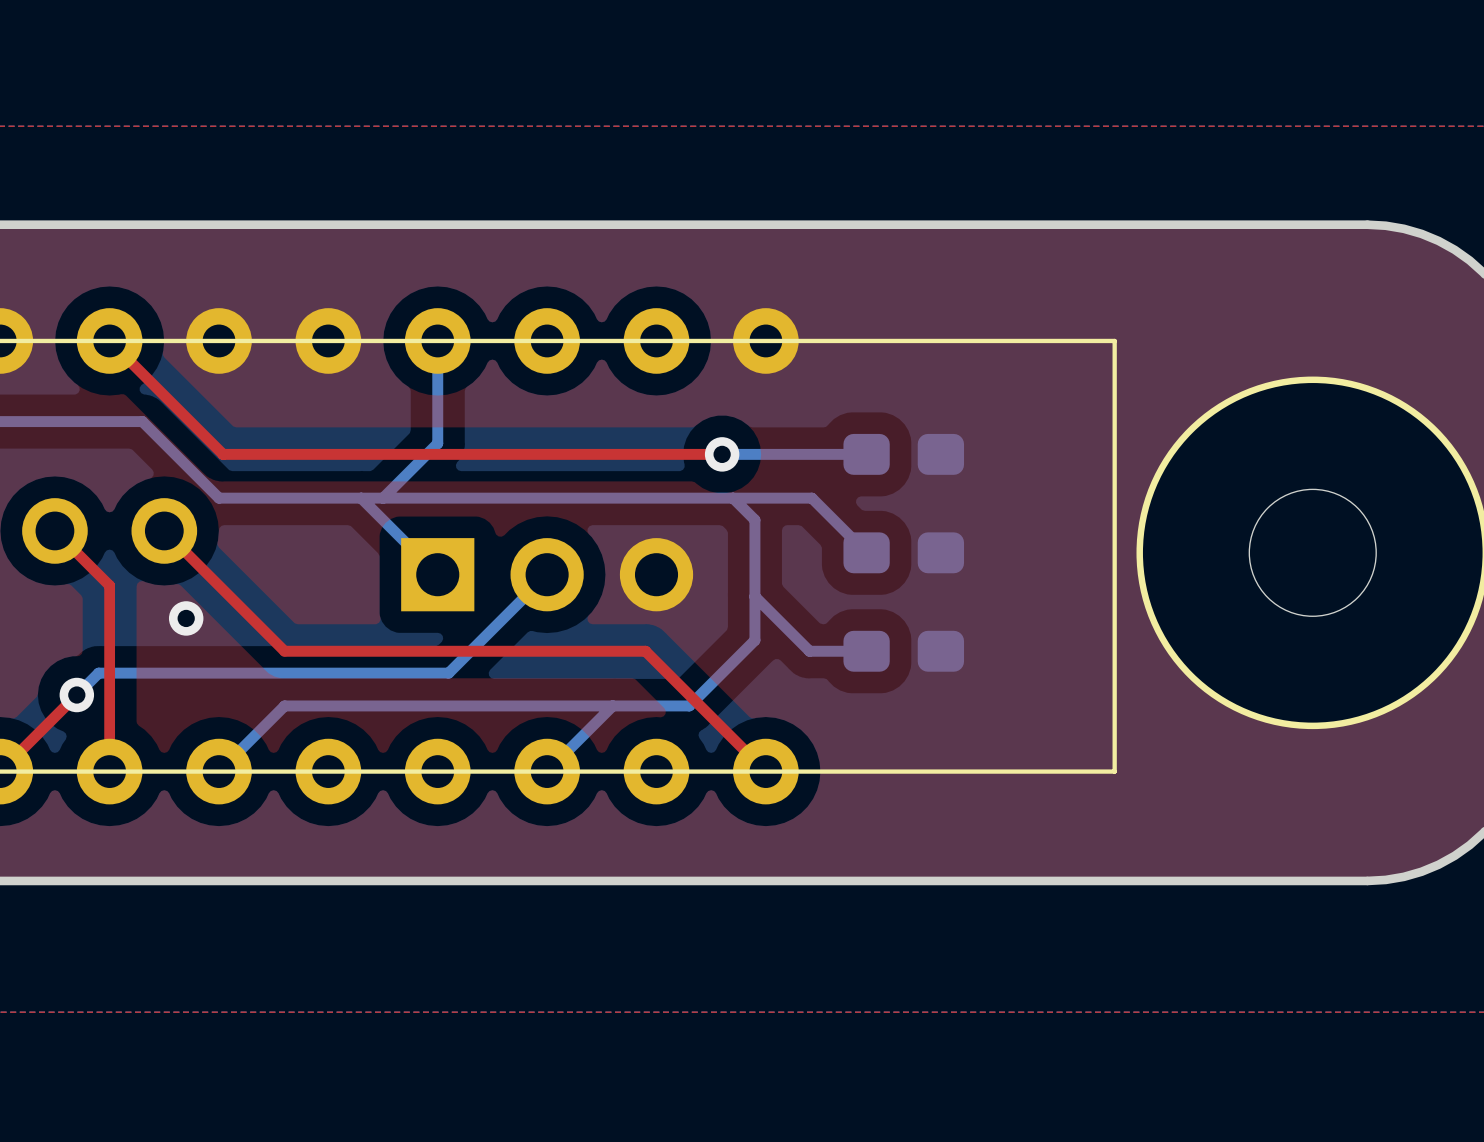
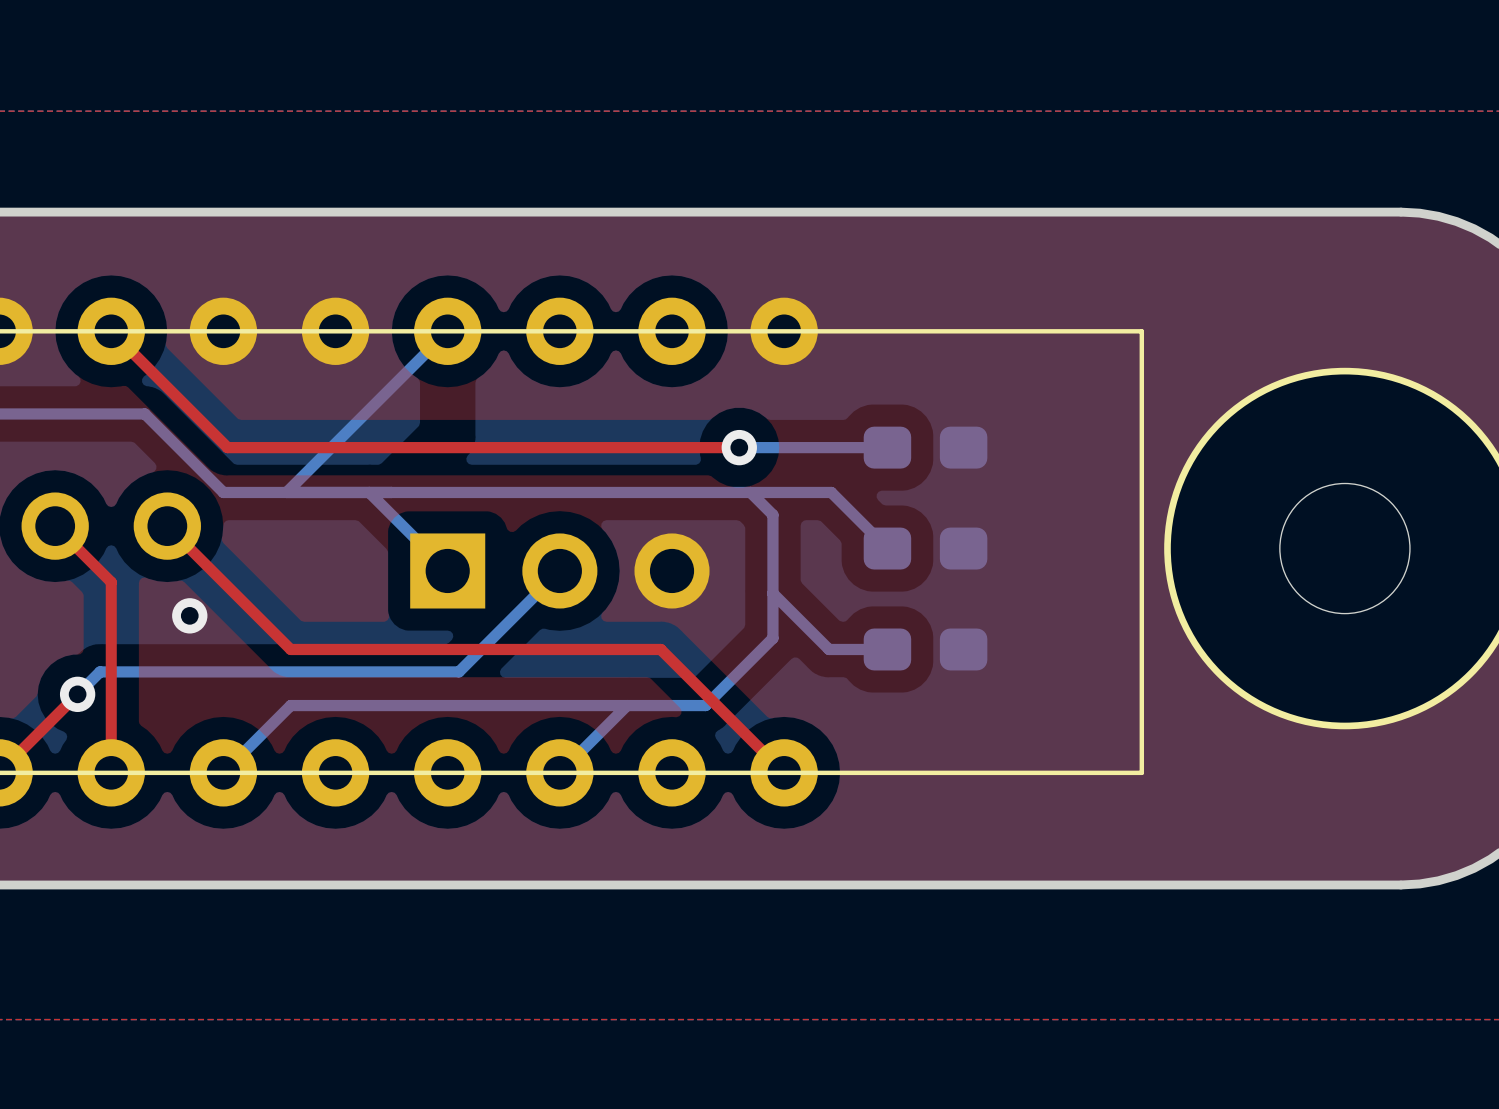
bottom track: (437, 340) (437, 443) (383, 498) -> (447, 331) (286, 492)

